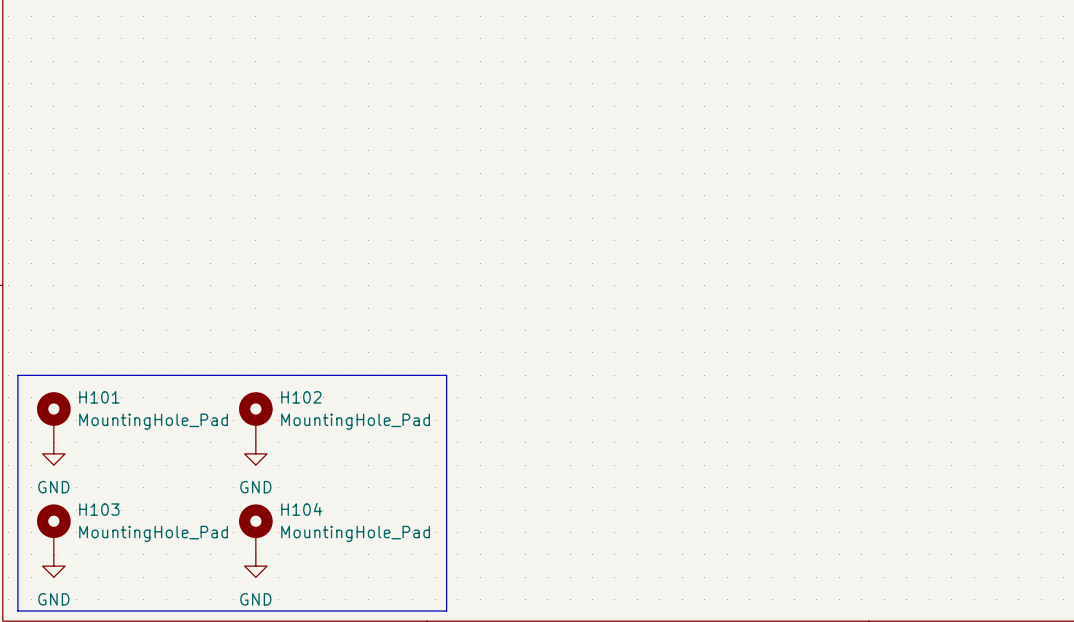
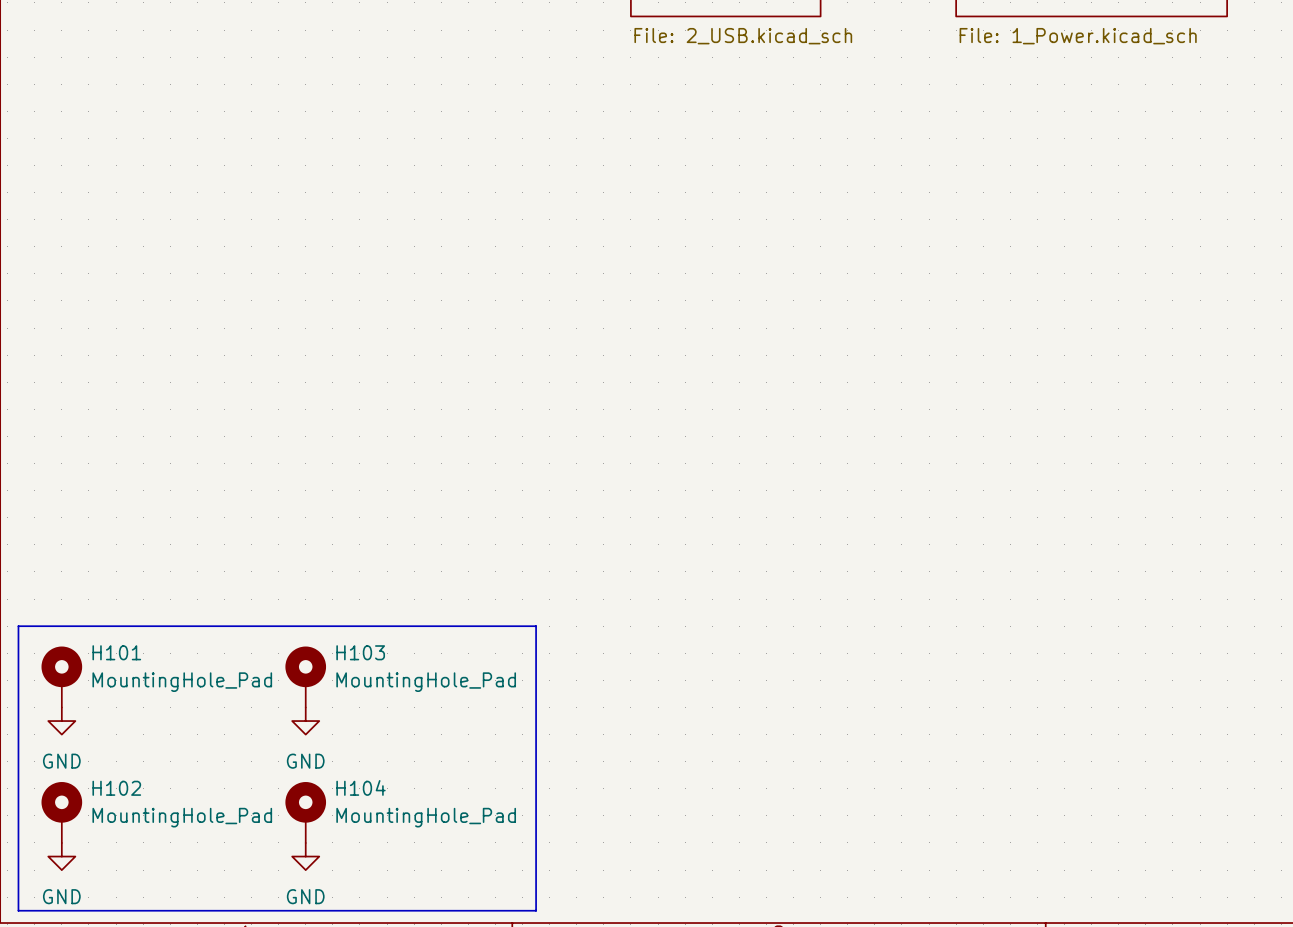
H102 name: H102 (301, 397) -> H103 (360, 652)
H103 name: H103 (99, 509) -> H102 (116, 788)

